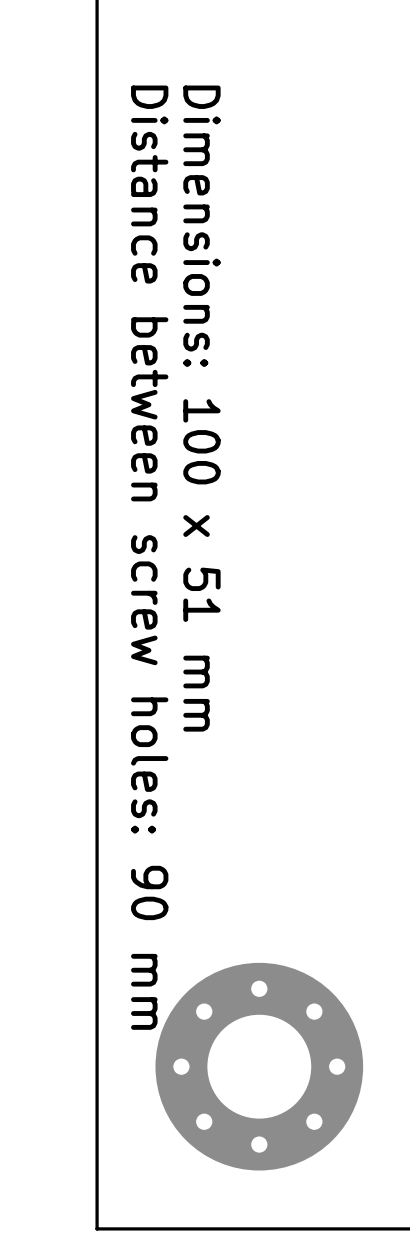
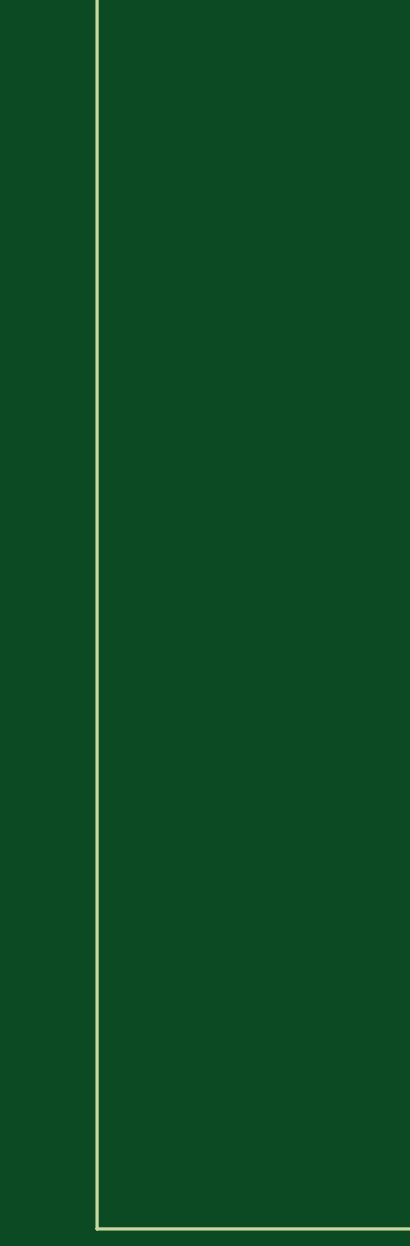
text: Dimensions: 100 x 51 mm (201, 408) -> none
text: Distance between screw holes: 90 mm (149, 557) -> none
part: (259, 1066) -> none

